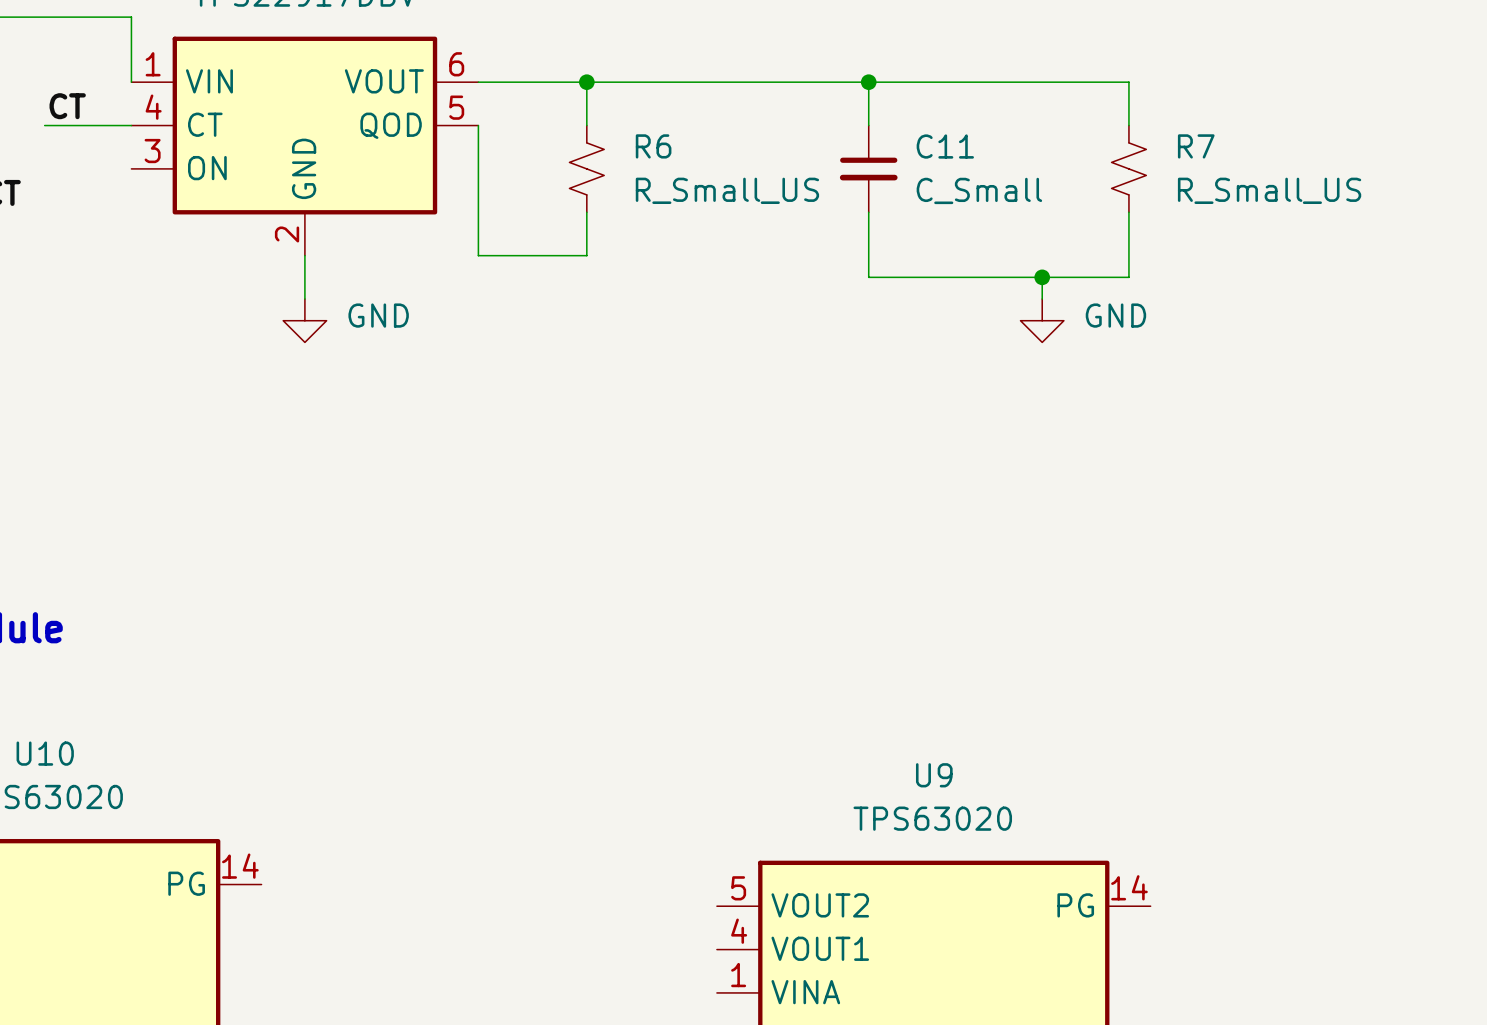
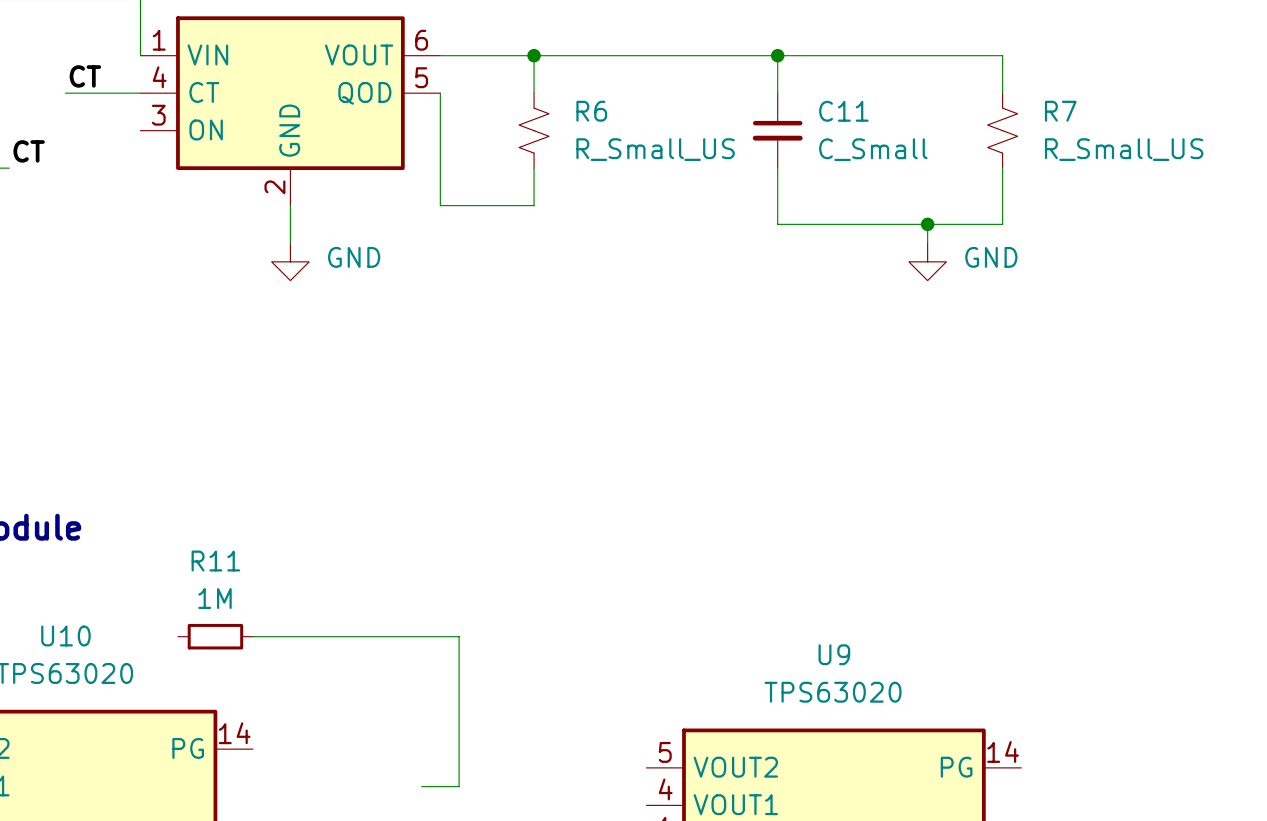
R11: none -> 1M (215, 636)
wire: none -> (252, 636) (459, 636) (459, 786) (421, 786)

